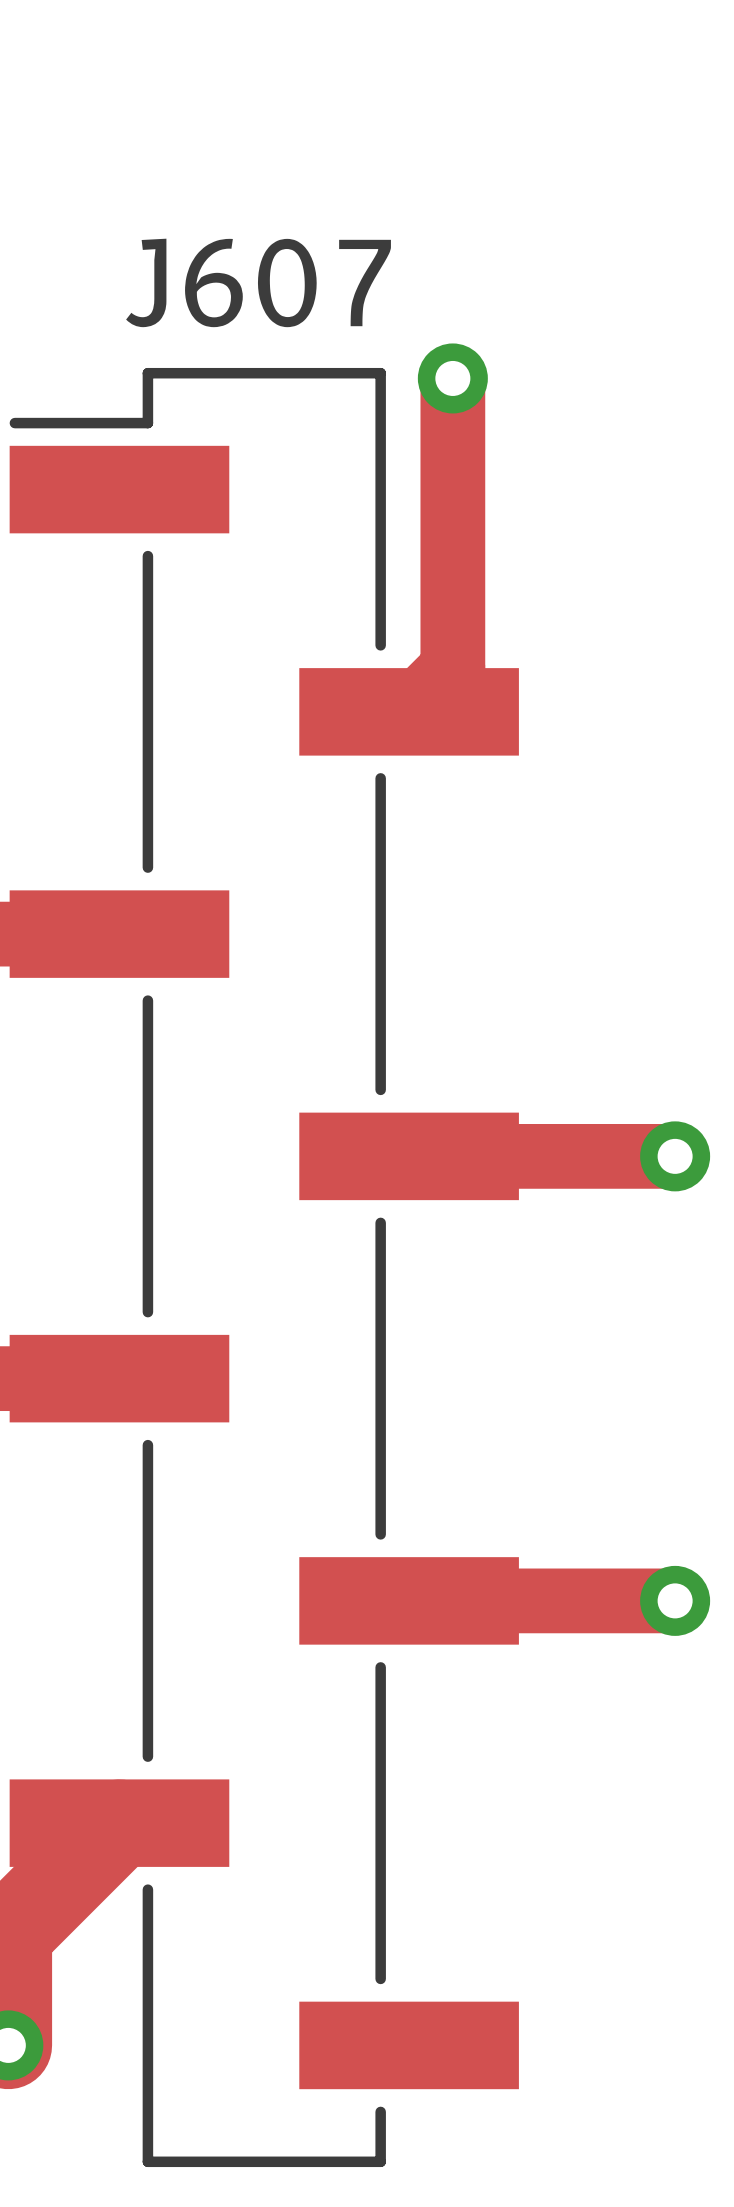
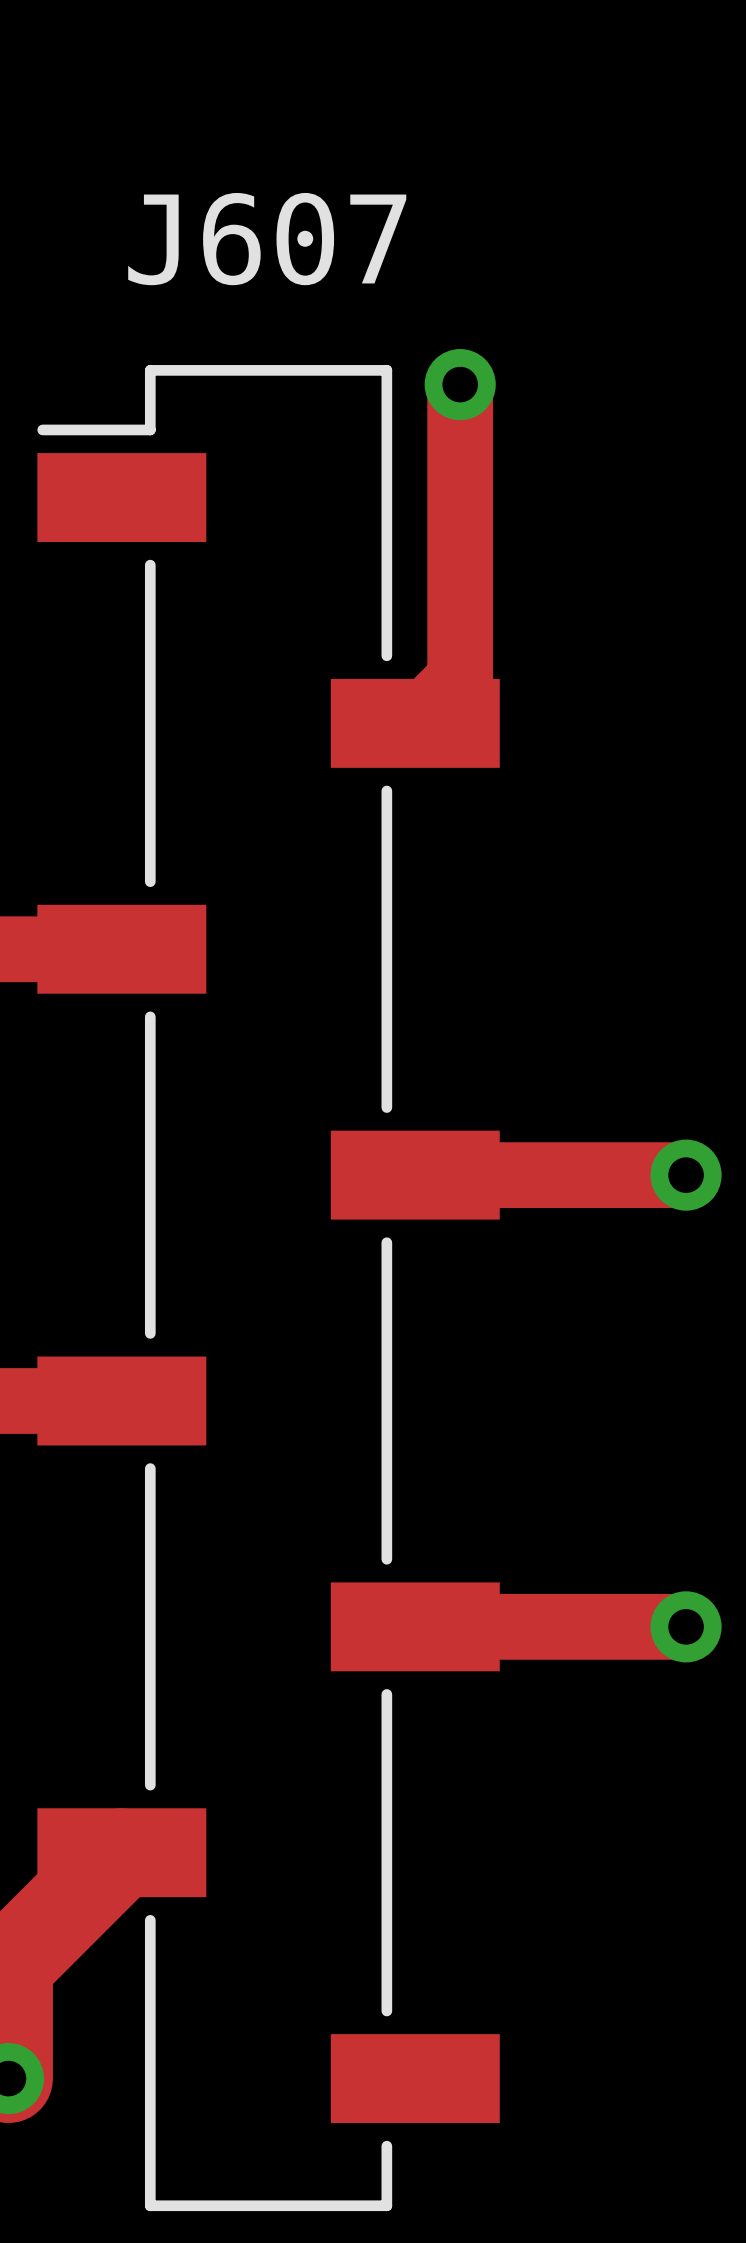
J607 name position: J607 (258, 282) -> J607 (267, 239)
J607 footprint: [9, 367, 519, 2168] -> [37, 365, 500, 2212]

